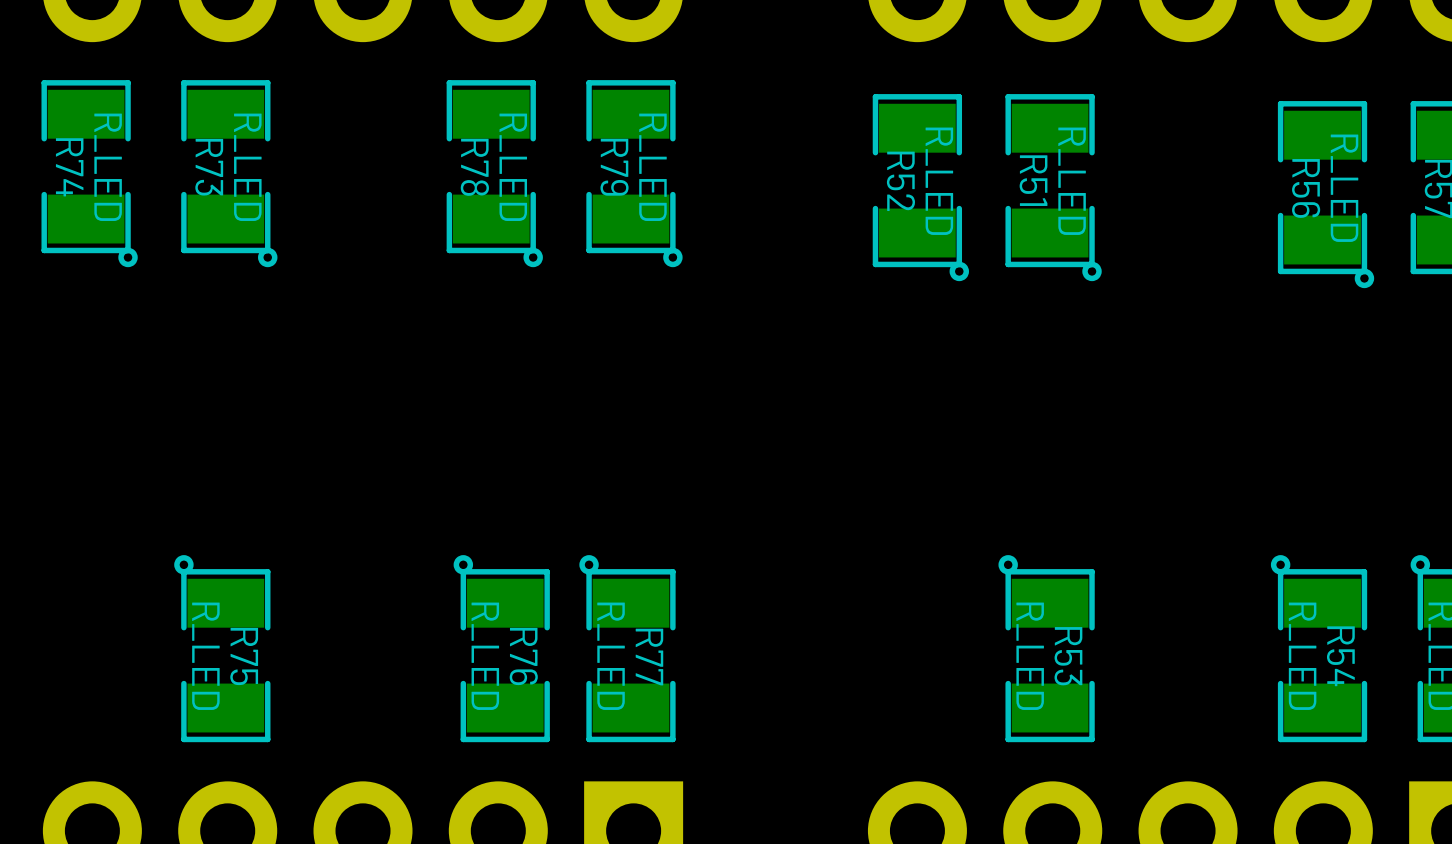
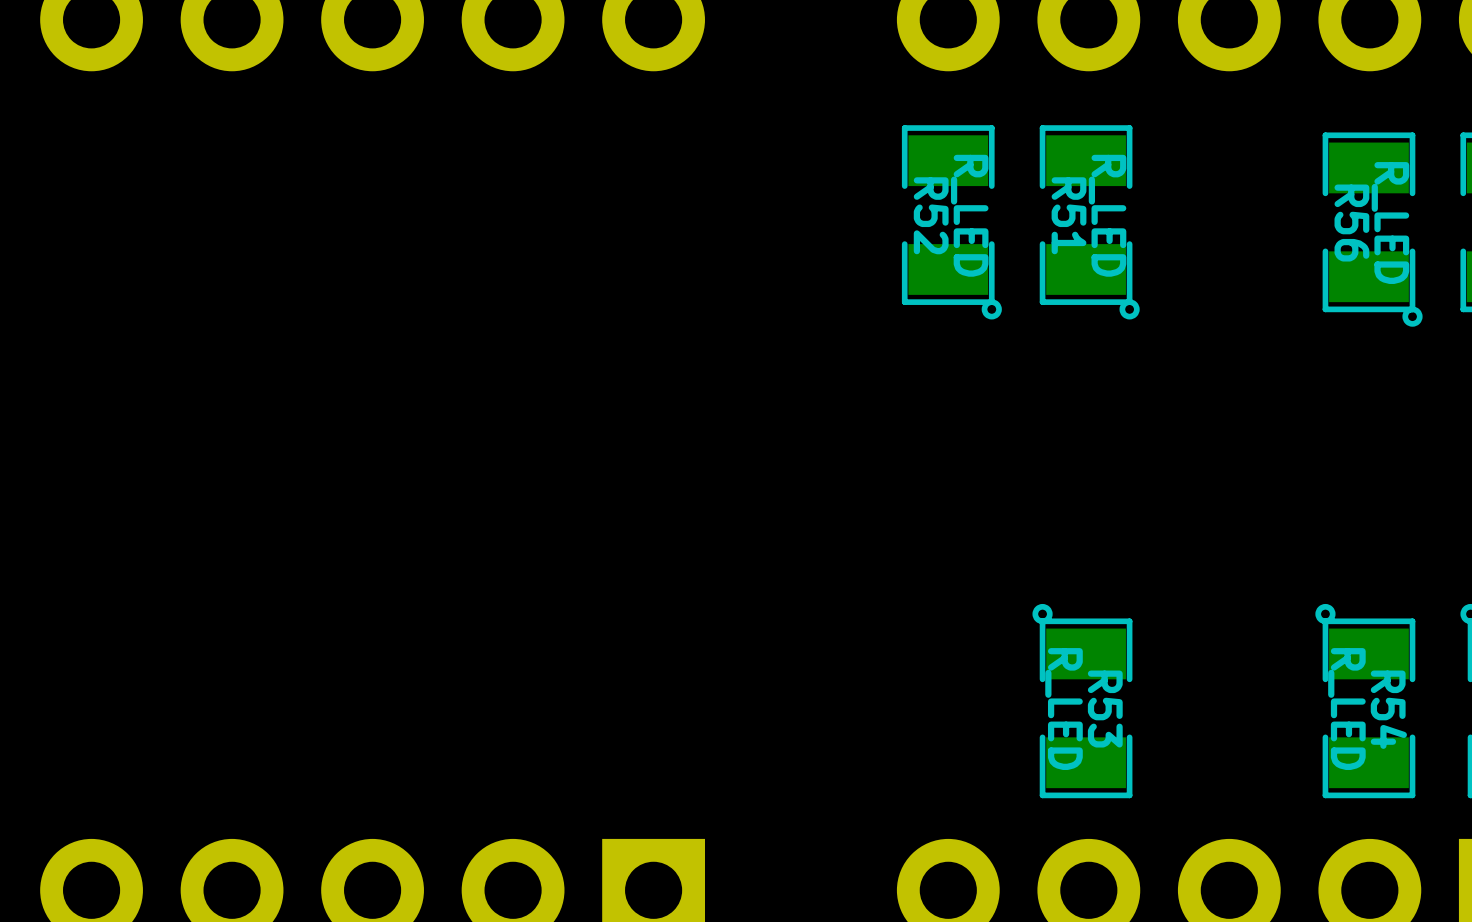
R74: R_LED (89, 173) -> none
R73: R_LED (229, 173) -> none
R78: R_LED (494, 173) -> none
R79: R_LED (634, 173) -> none
R75: R_LED (222, 648) -> none
R76: R_LED (501, 648) -> none
R77: R_LED (627, 648) -> none

